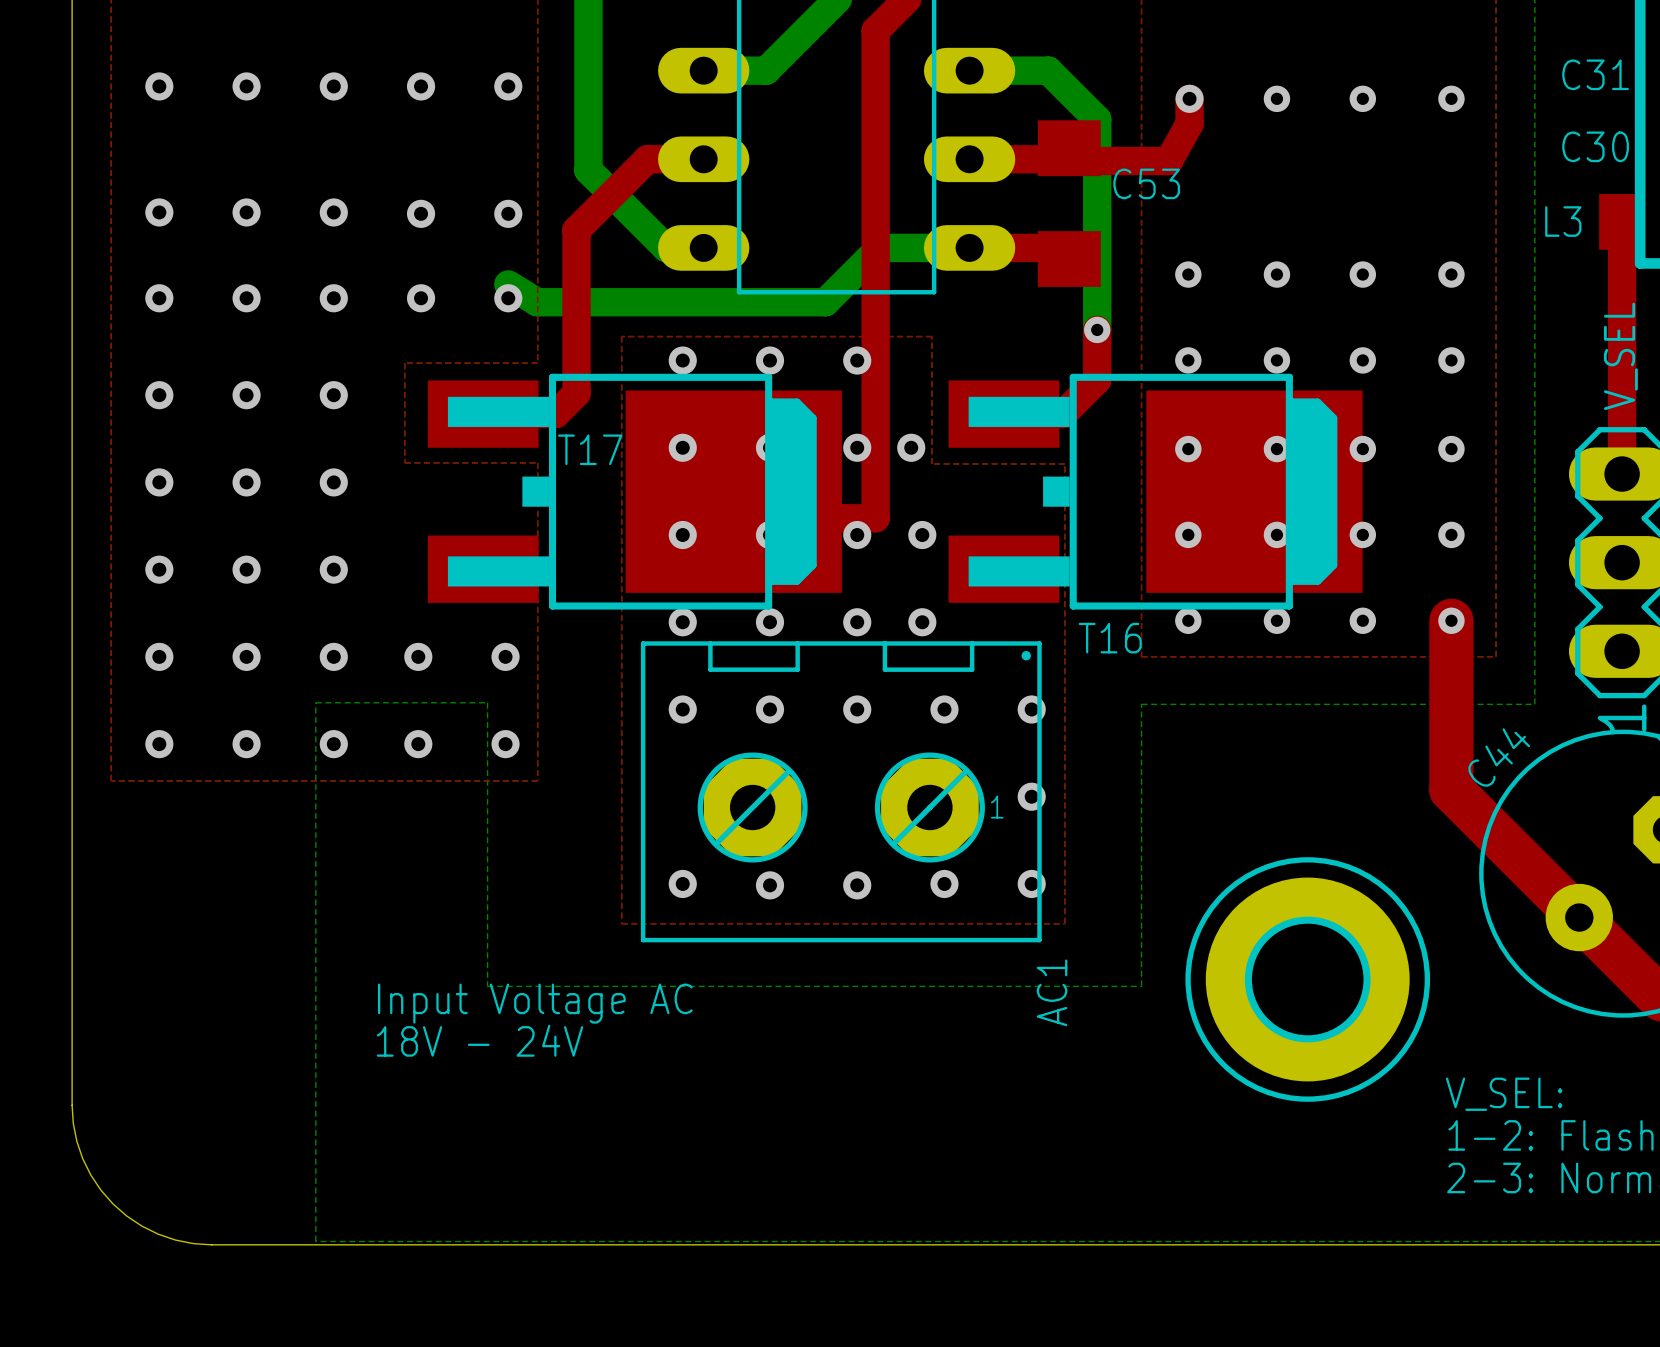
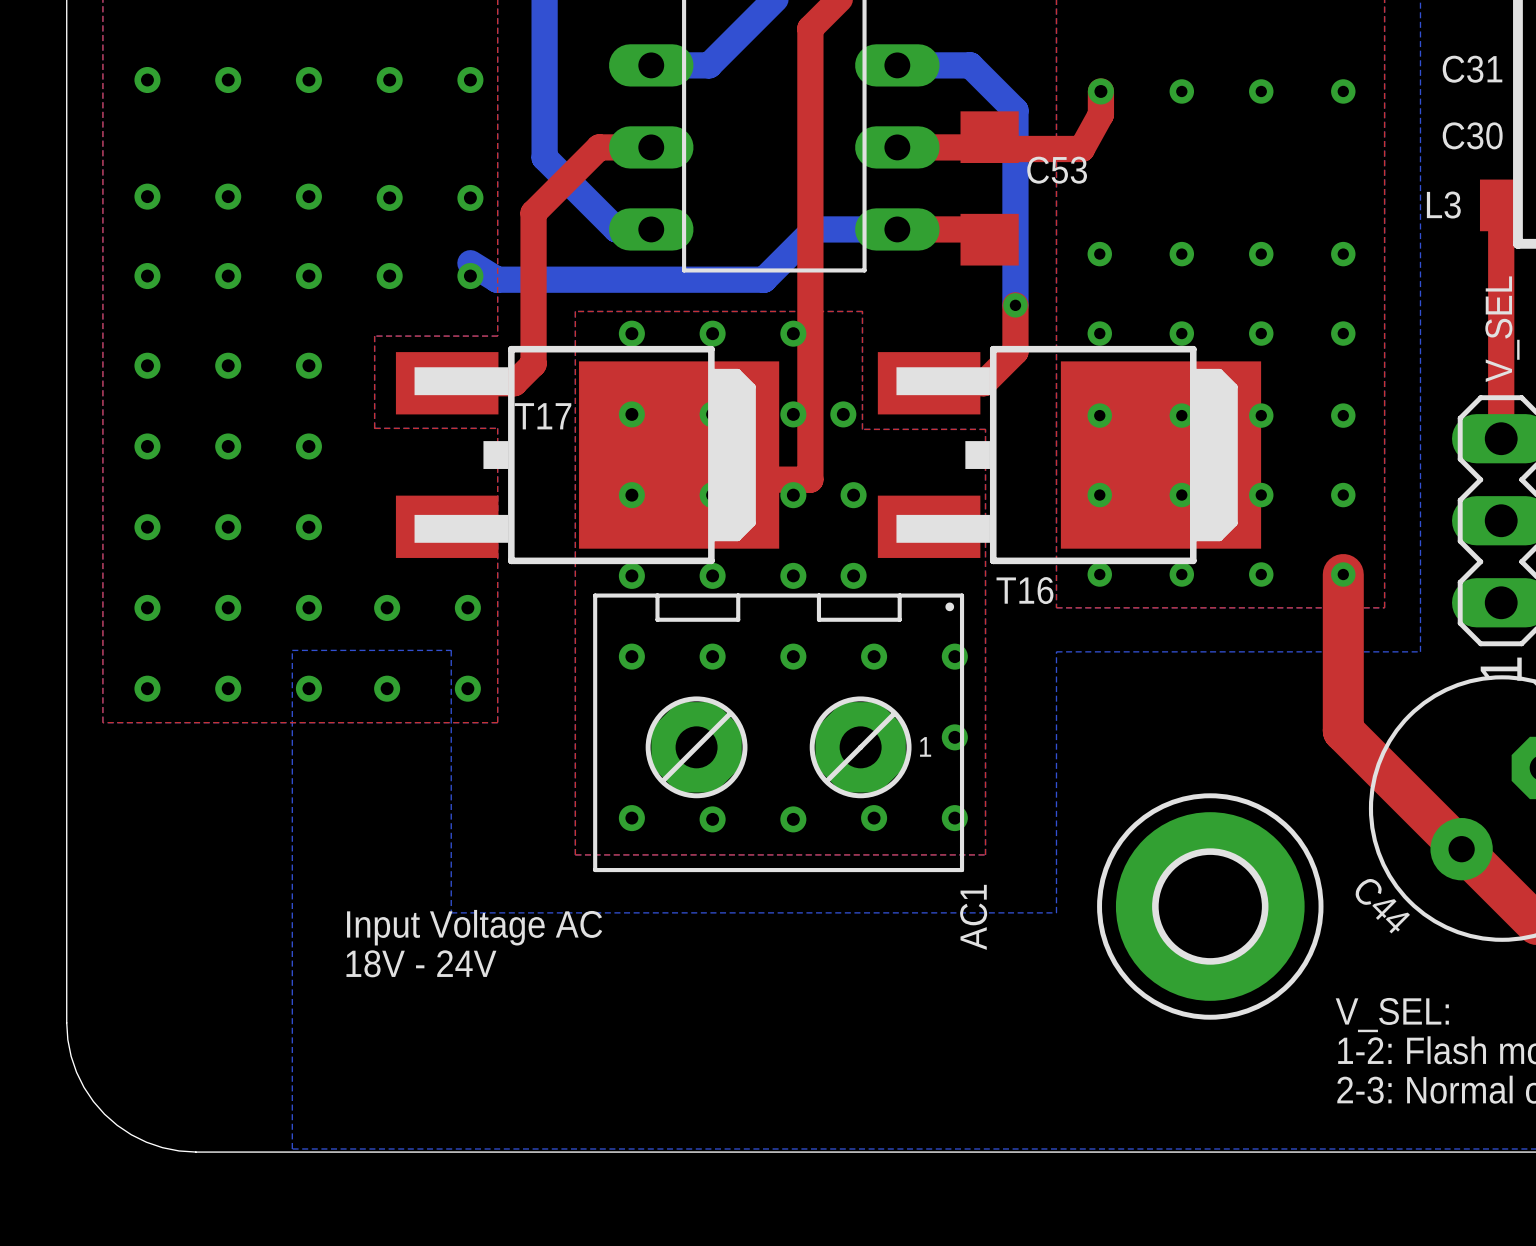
C44 name rotation: 0° (1499, 757) -> 90° clockwise (1382, 906)
C44 name position: C44 (1499, 757) -> C44 (1382, 906)

